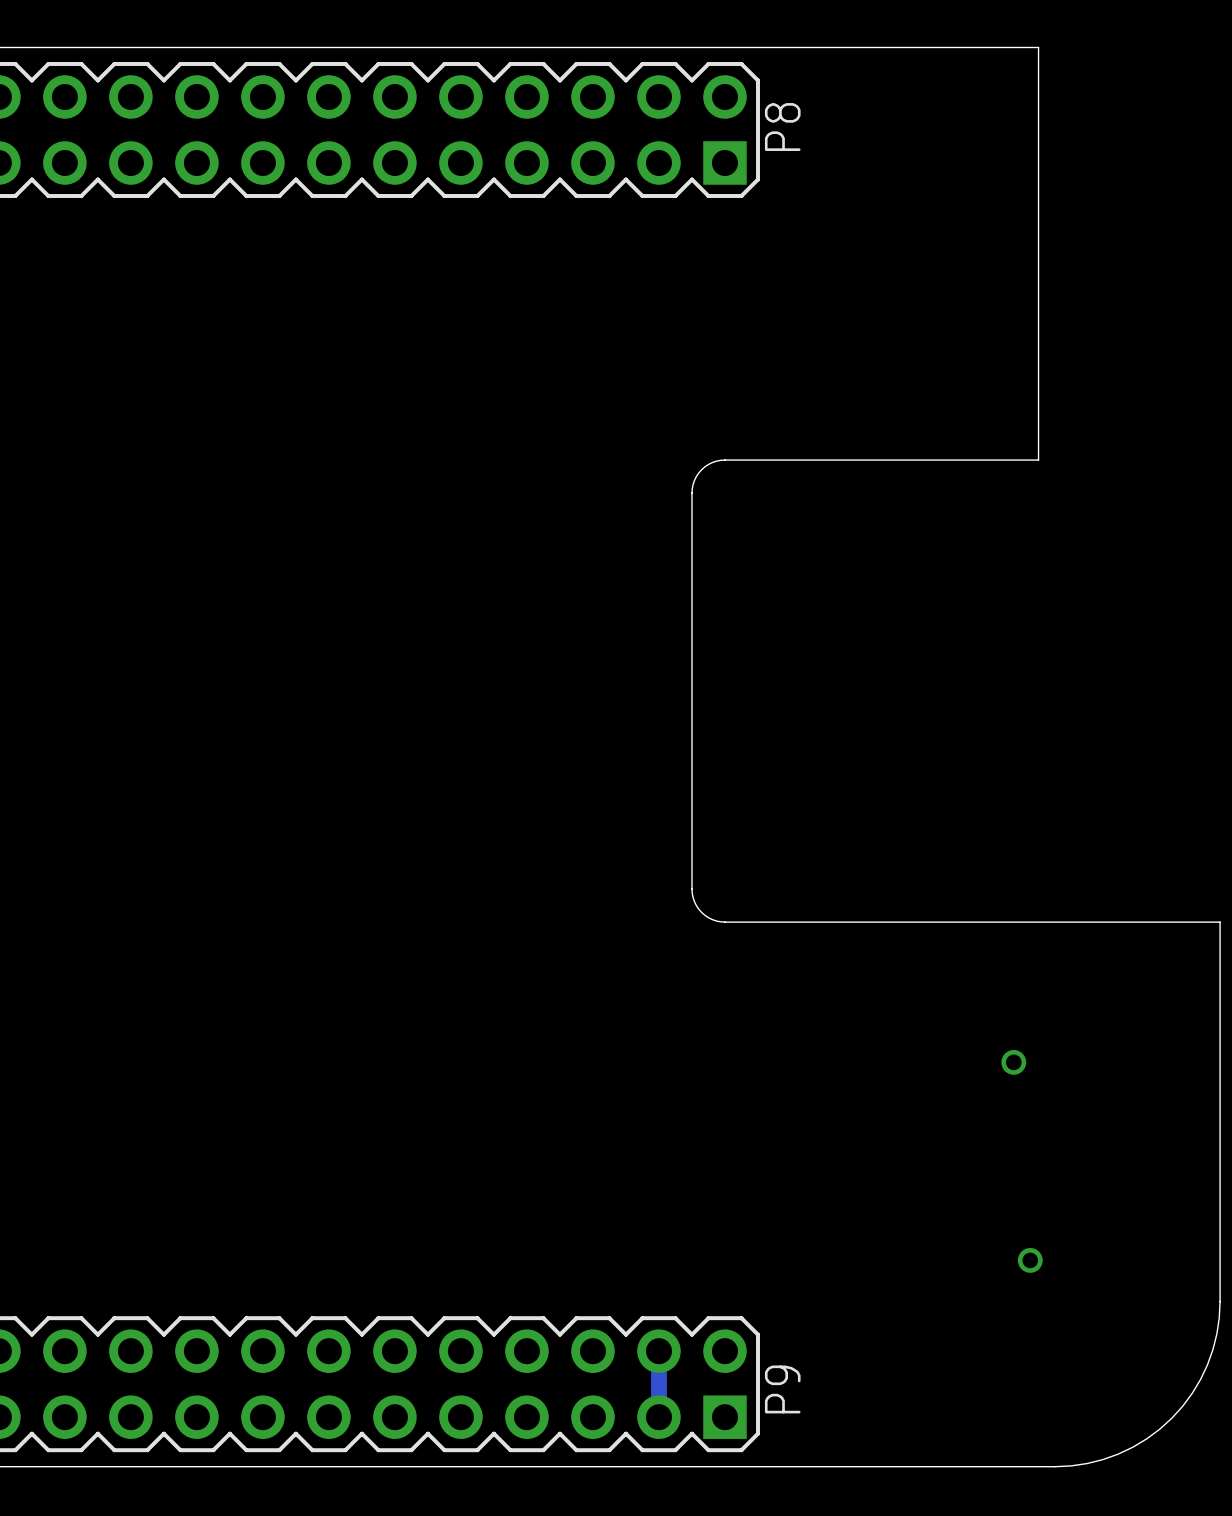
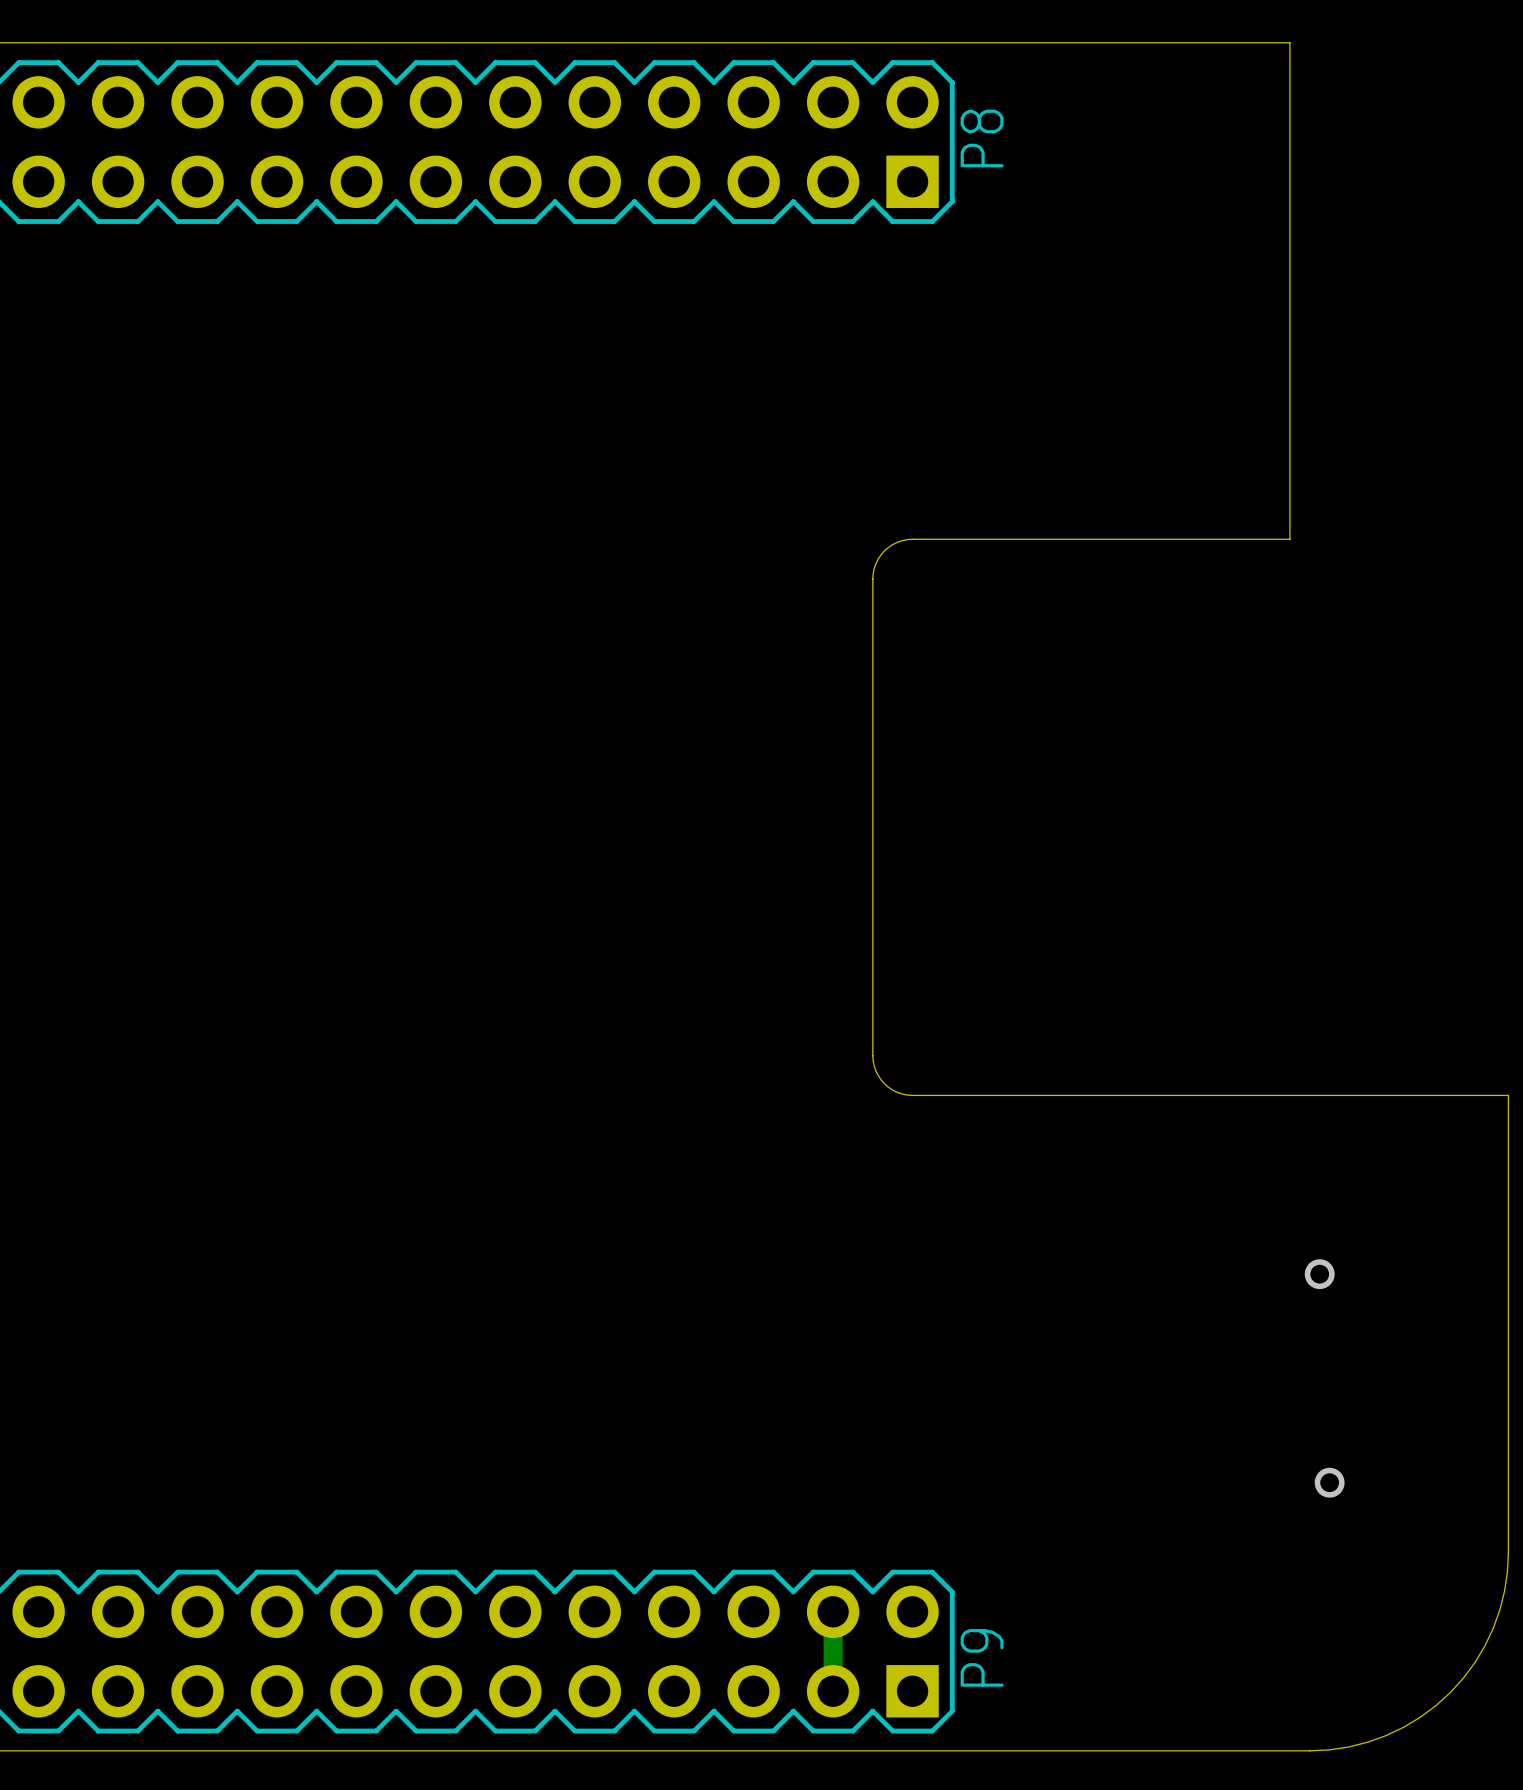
via position: (1013, 1062) -> (1319, 1274)
via position: (1030, 1260) -> (1329, 1482)

